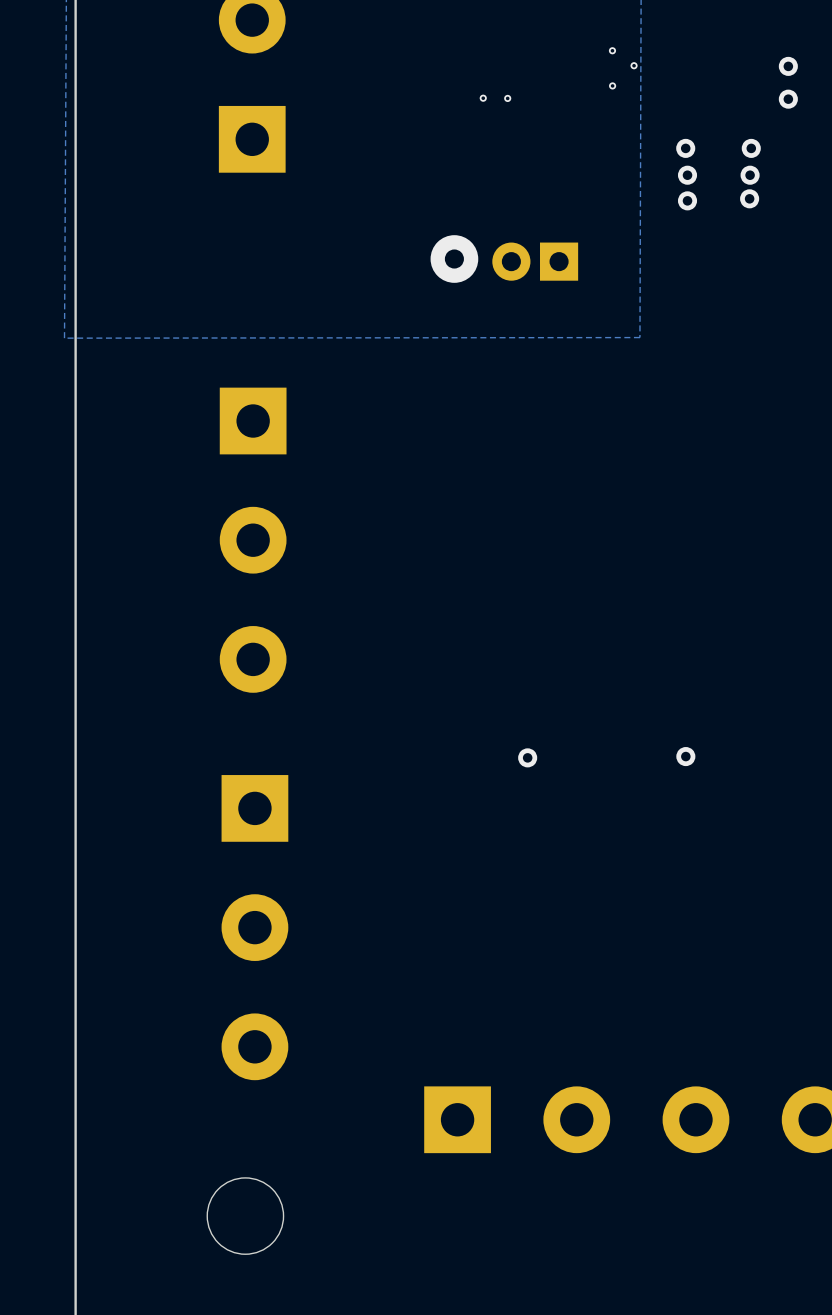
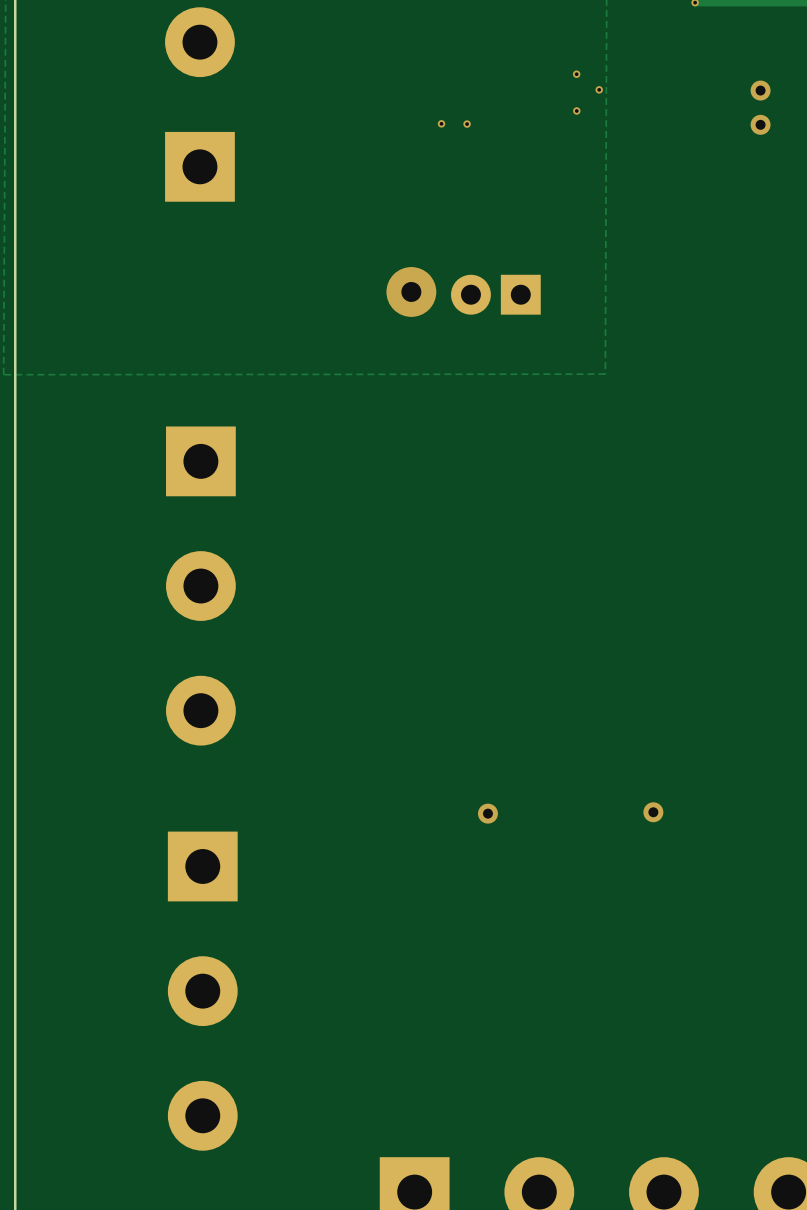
via: (685, 148) -> none
via: (751, 148) -> none
via: (687, 175) -> none
via: (750, 175) -> none
via: (749, 198) -> none
via: (687, 200) -> none

